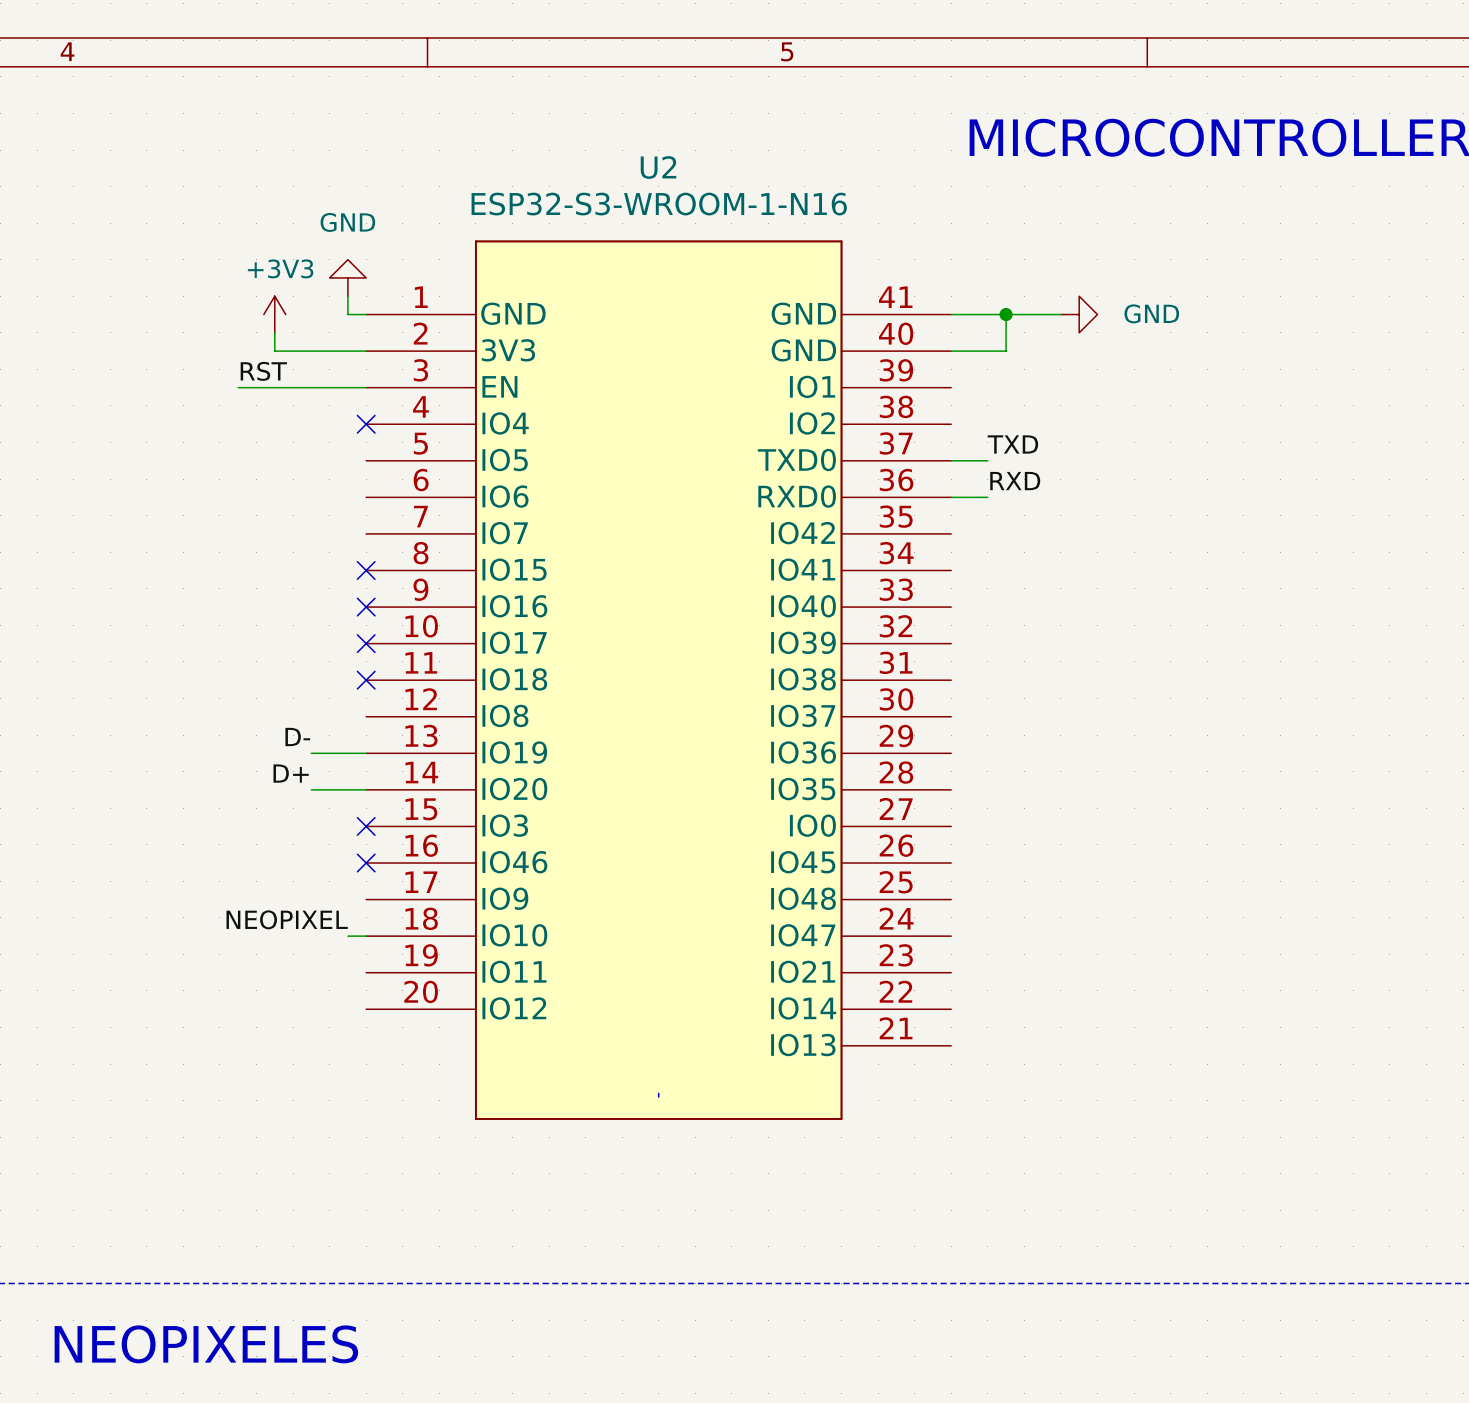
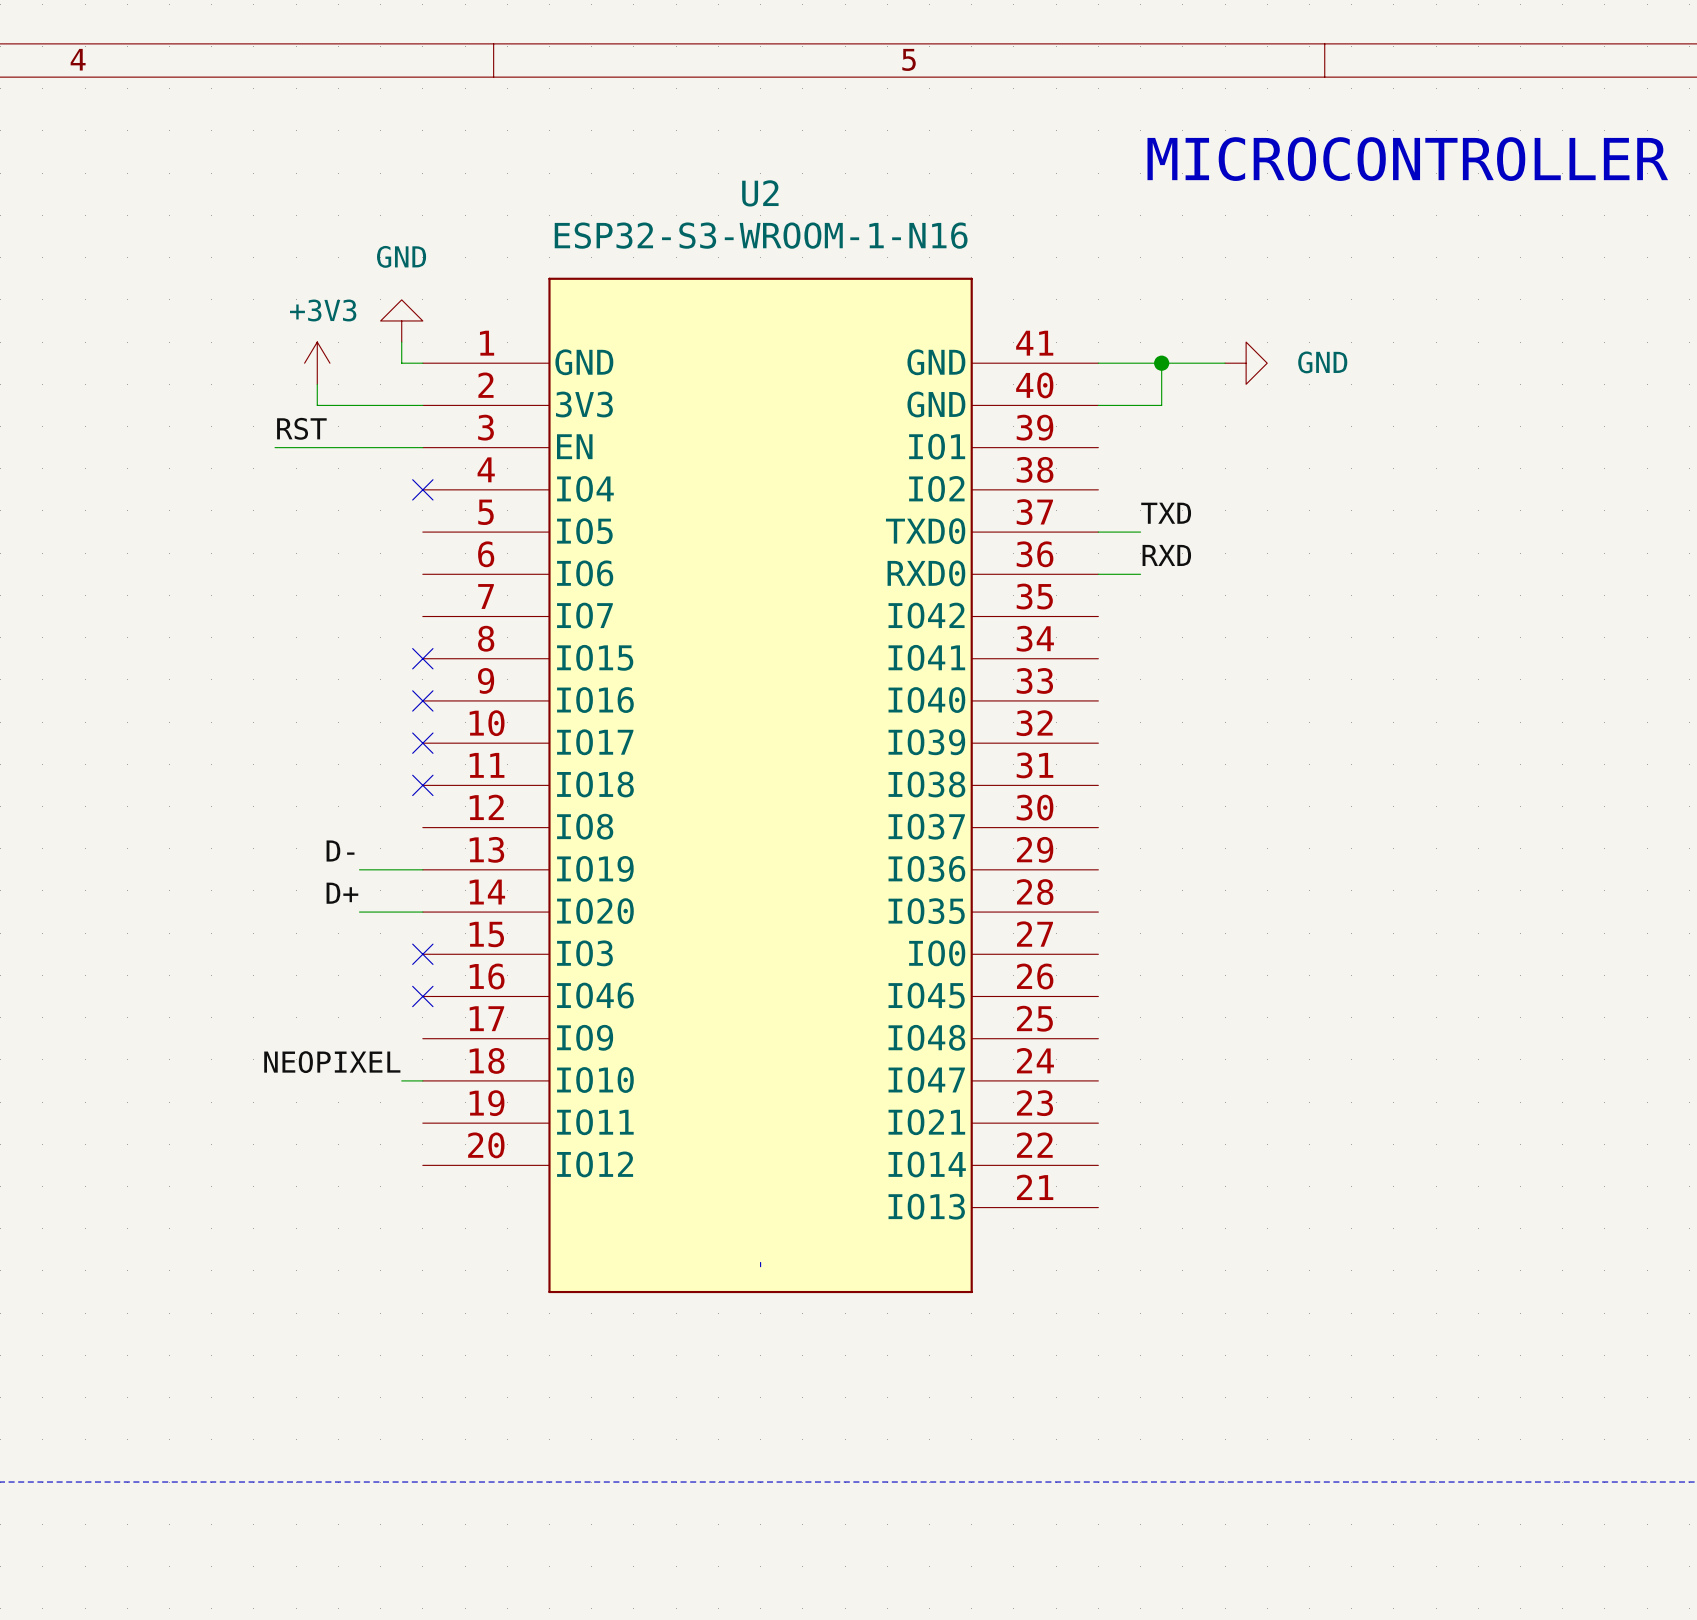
text: NEOPIXELES (206, 1344) -> none

